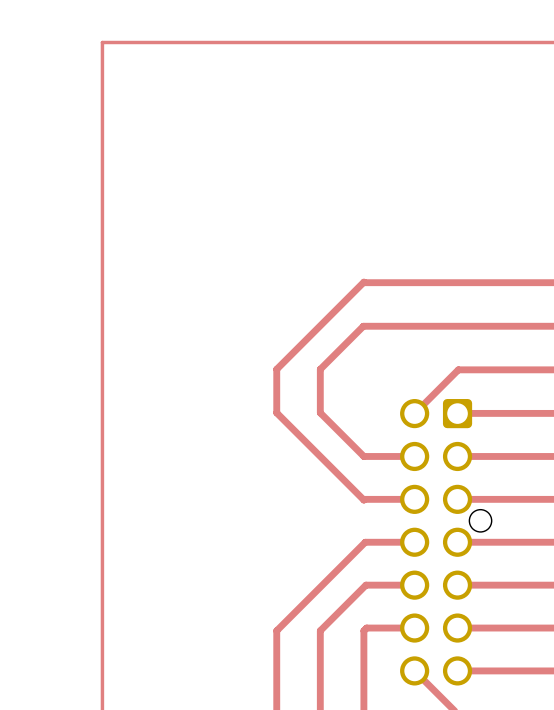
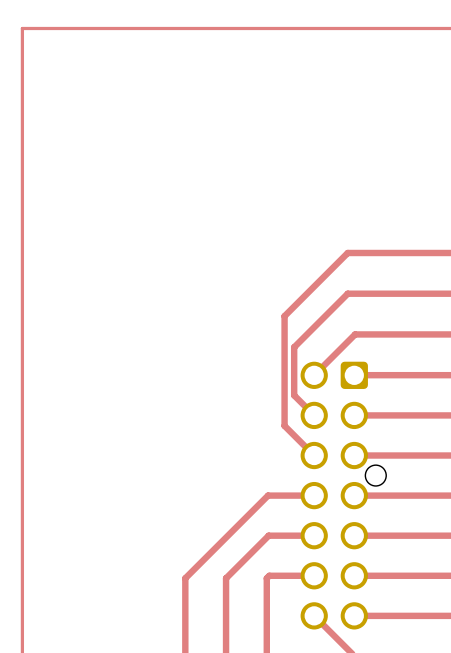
top track: (450, 282) (363, 282) (276, 369) (276, 412) (363, 500) (414, 499) -> (347, 252) (284, 316) (284, 425) (314, 455)
top track: (450, 326) (363, 326) (320, 369) (320, 412) (363, 456) (414, 456) -> (347, 293) (294, 347) (294, 395) (314, 415)

